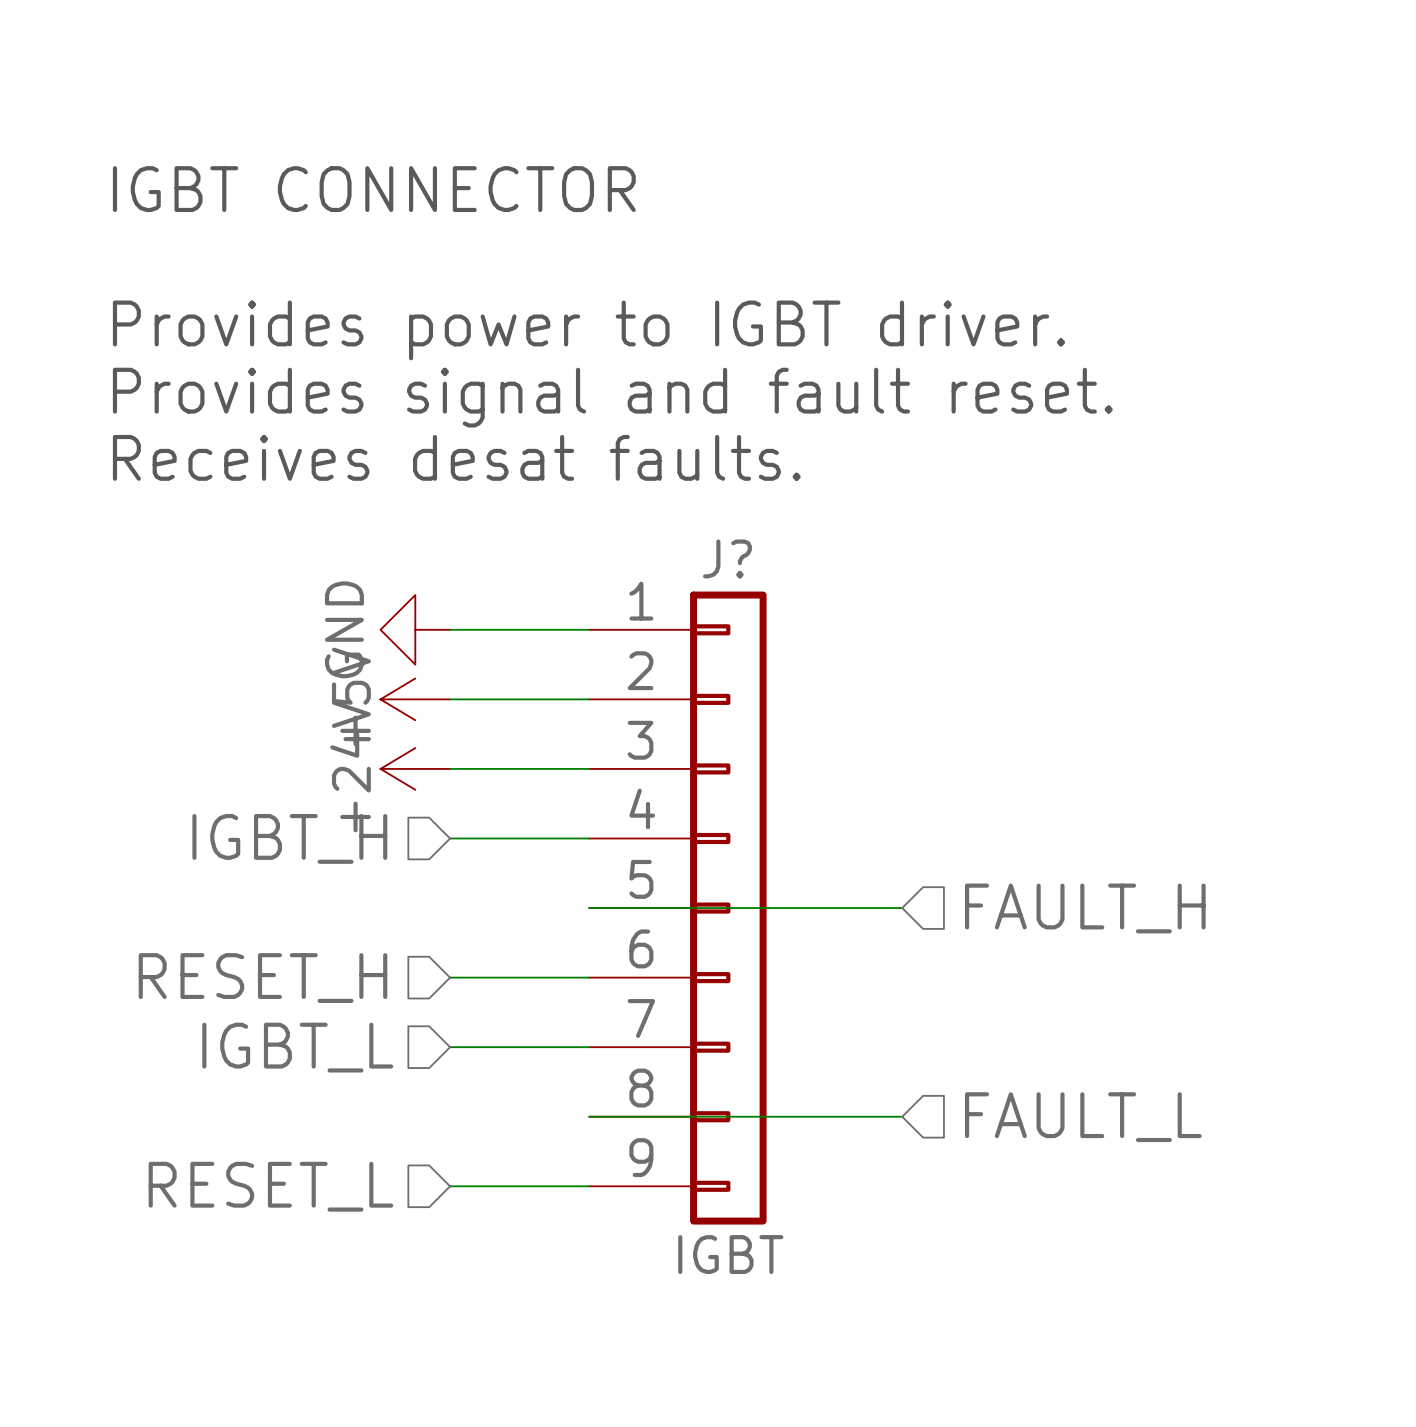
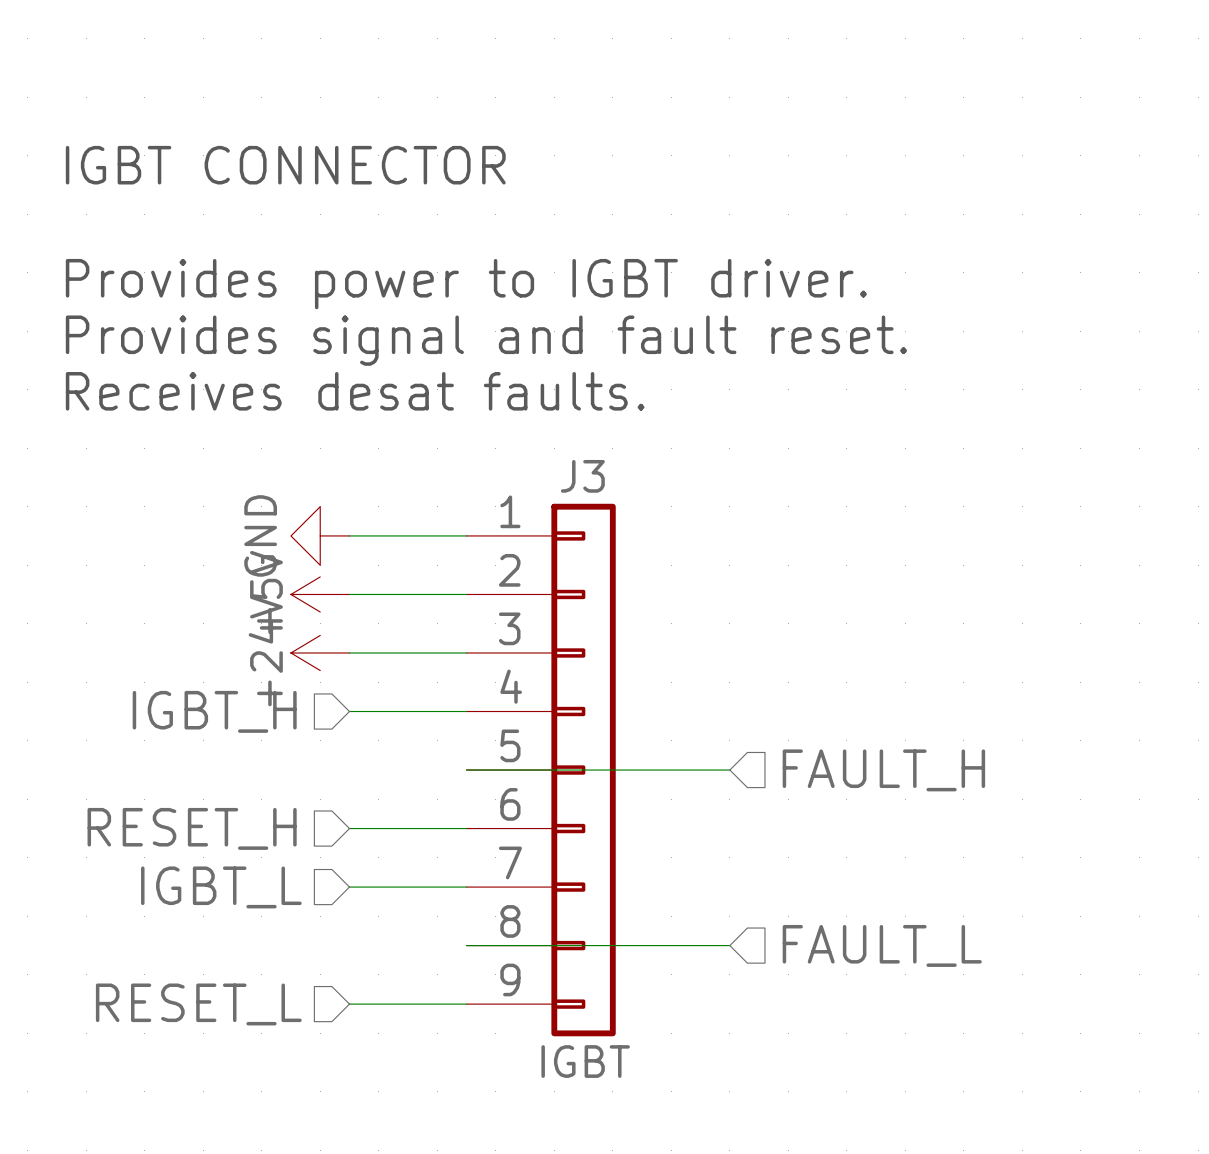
J? name: J? (727, 558) -> J3 (582, 476)

